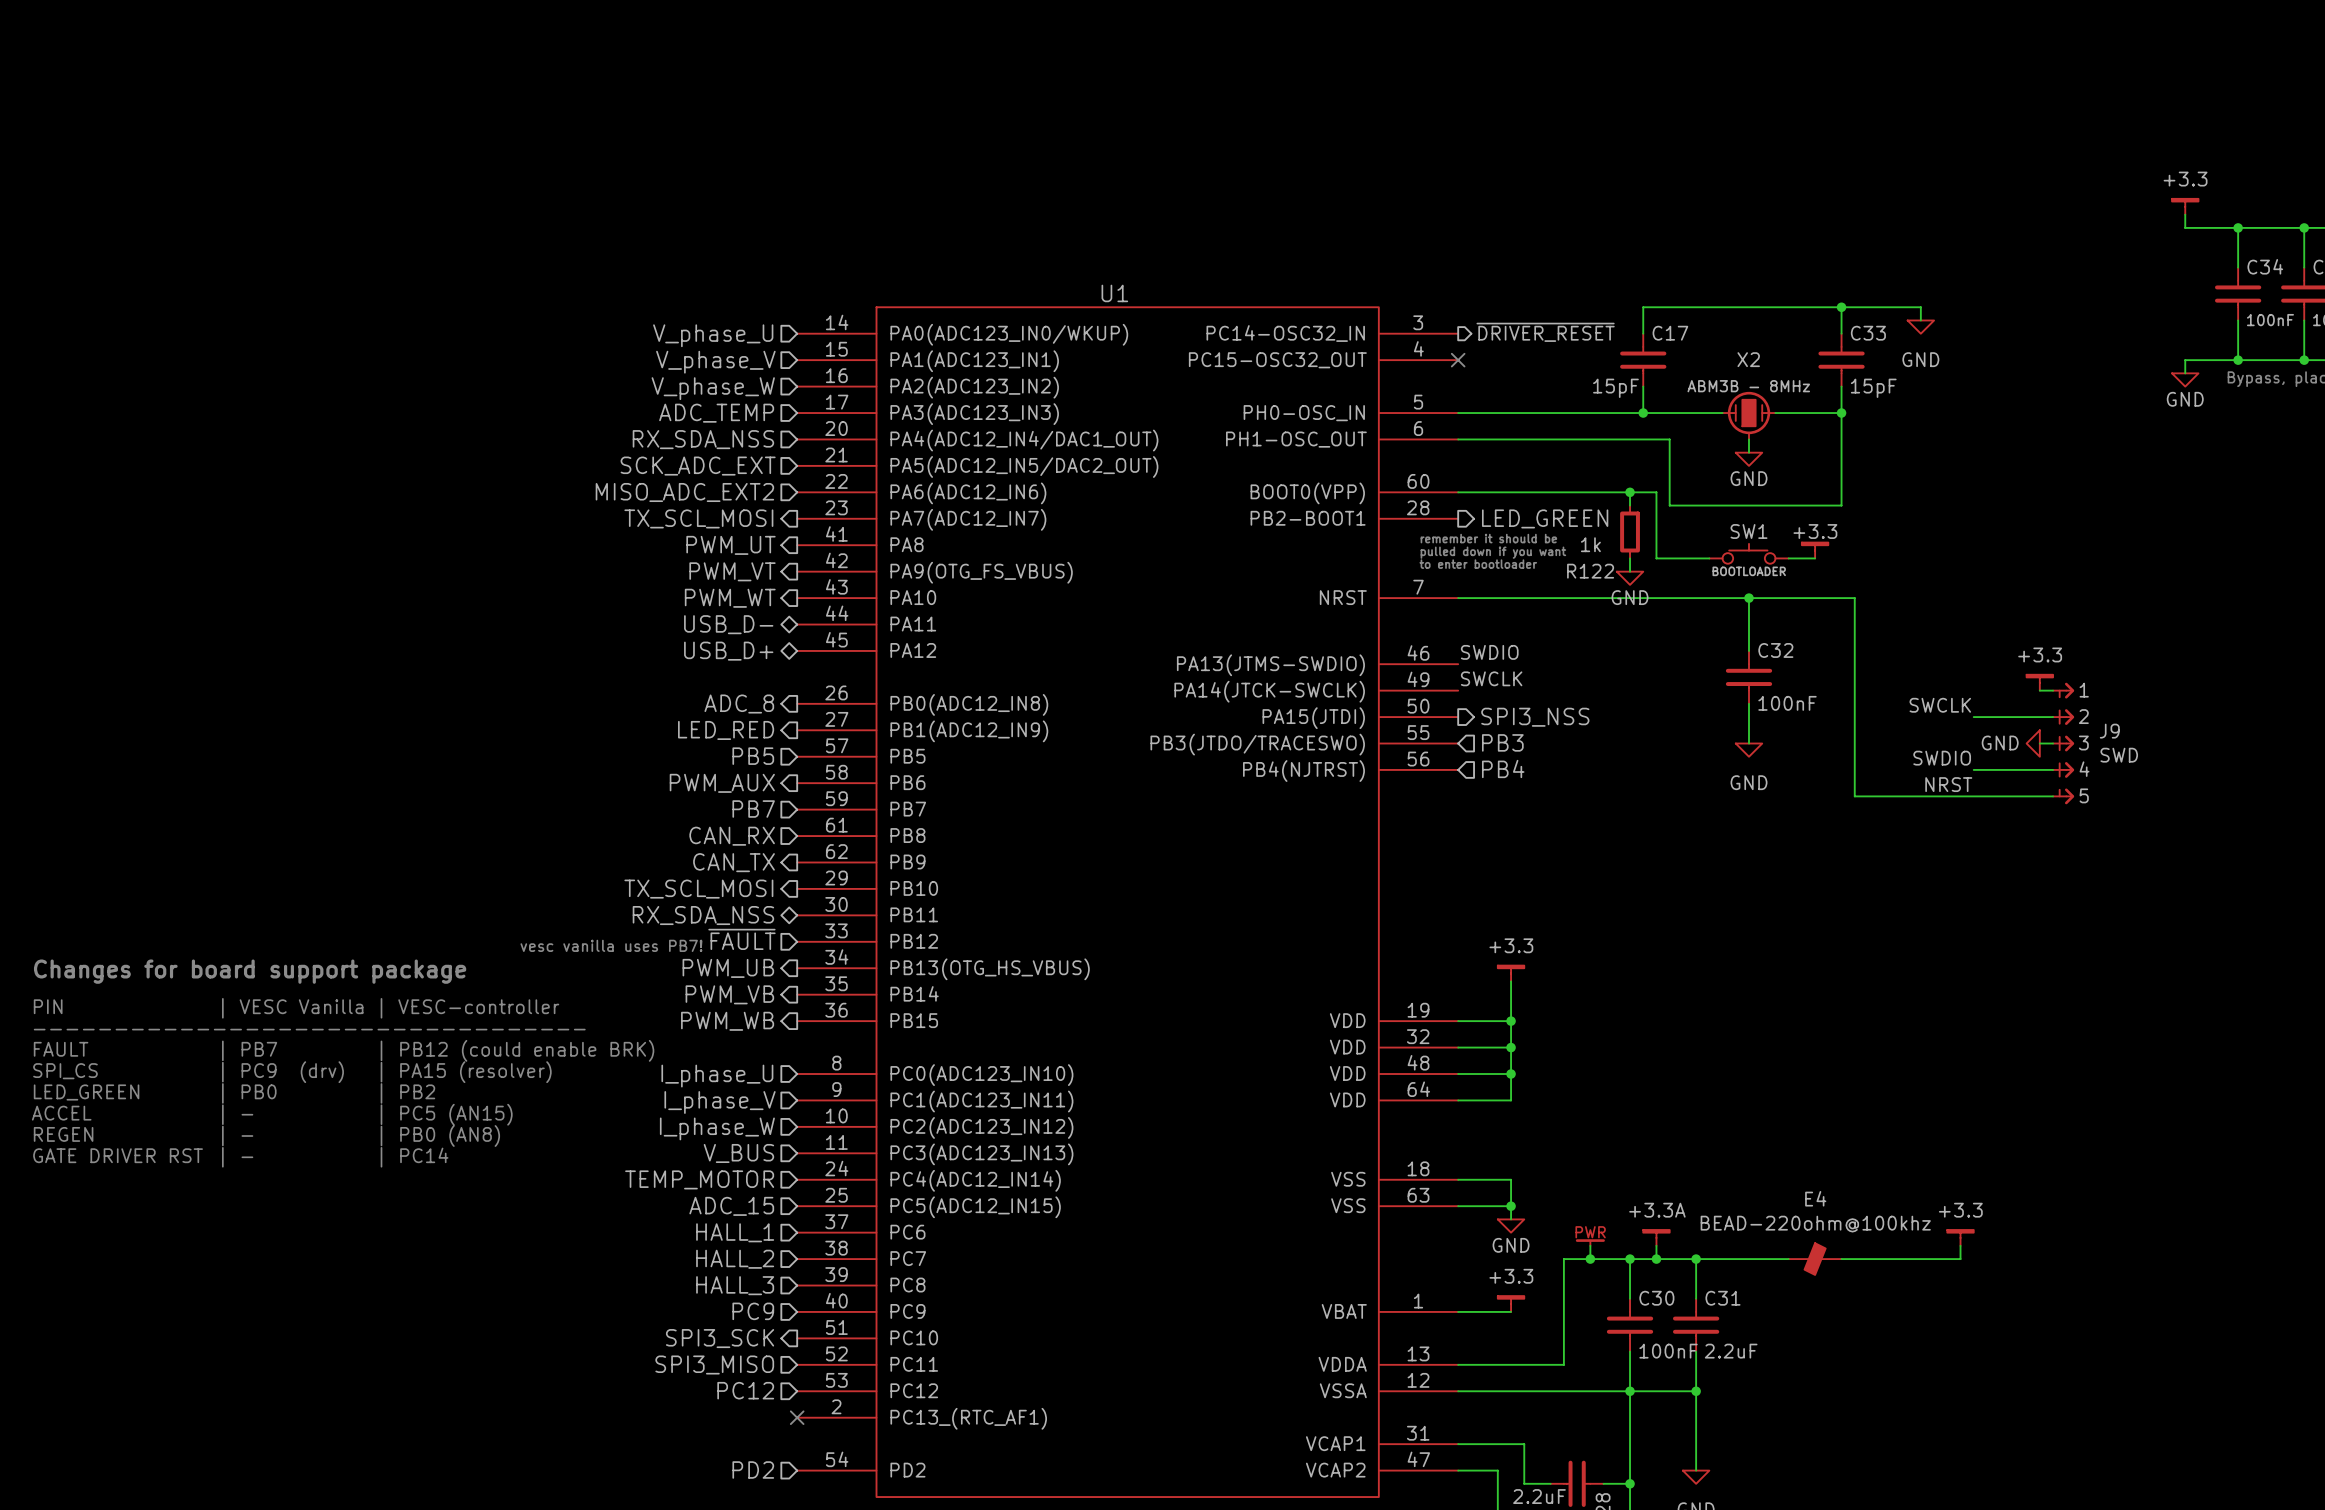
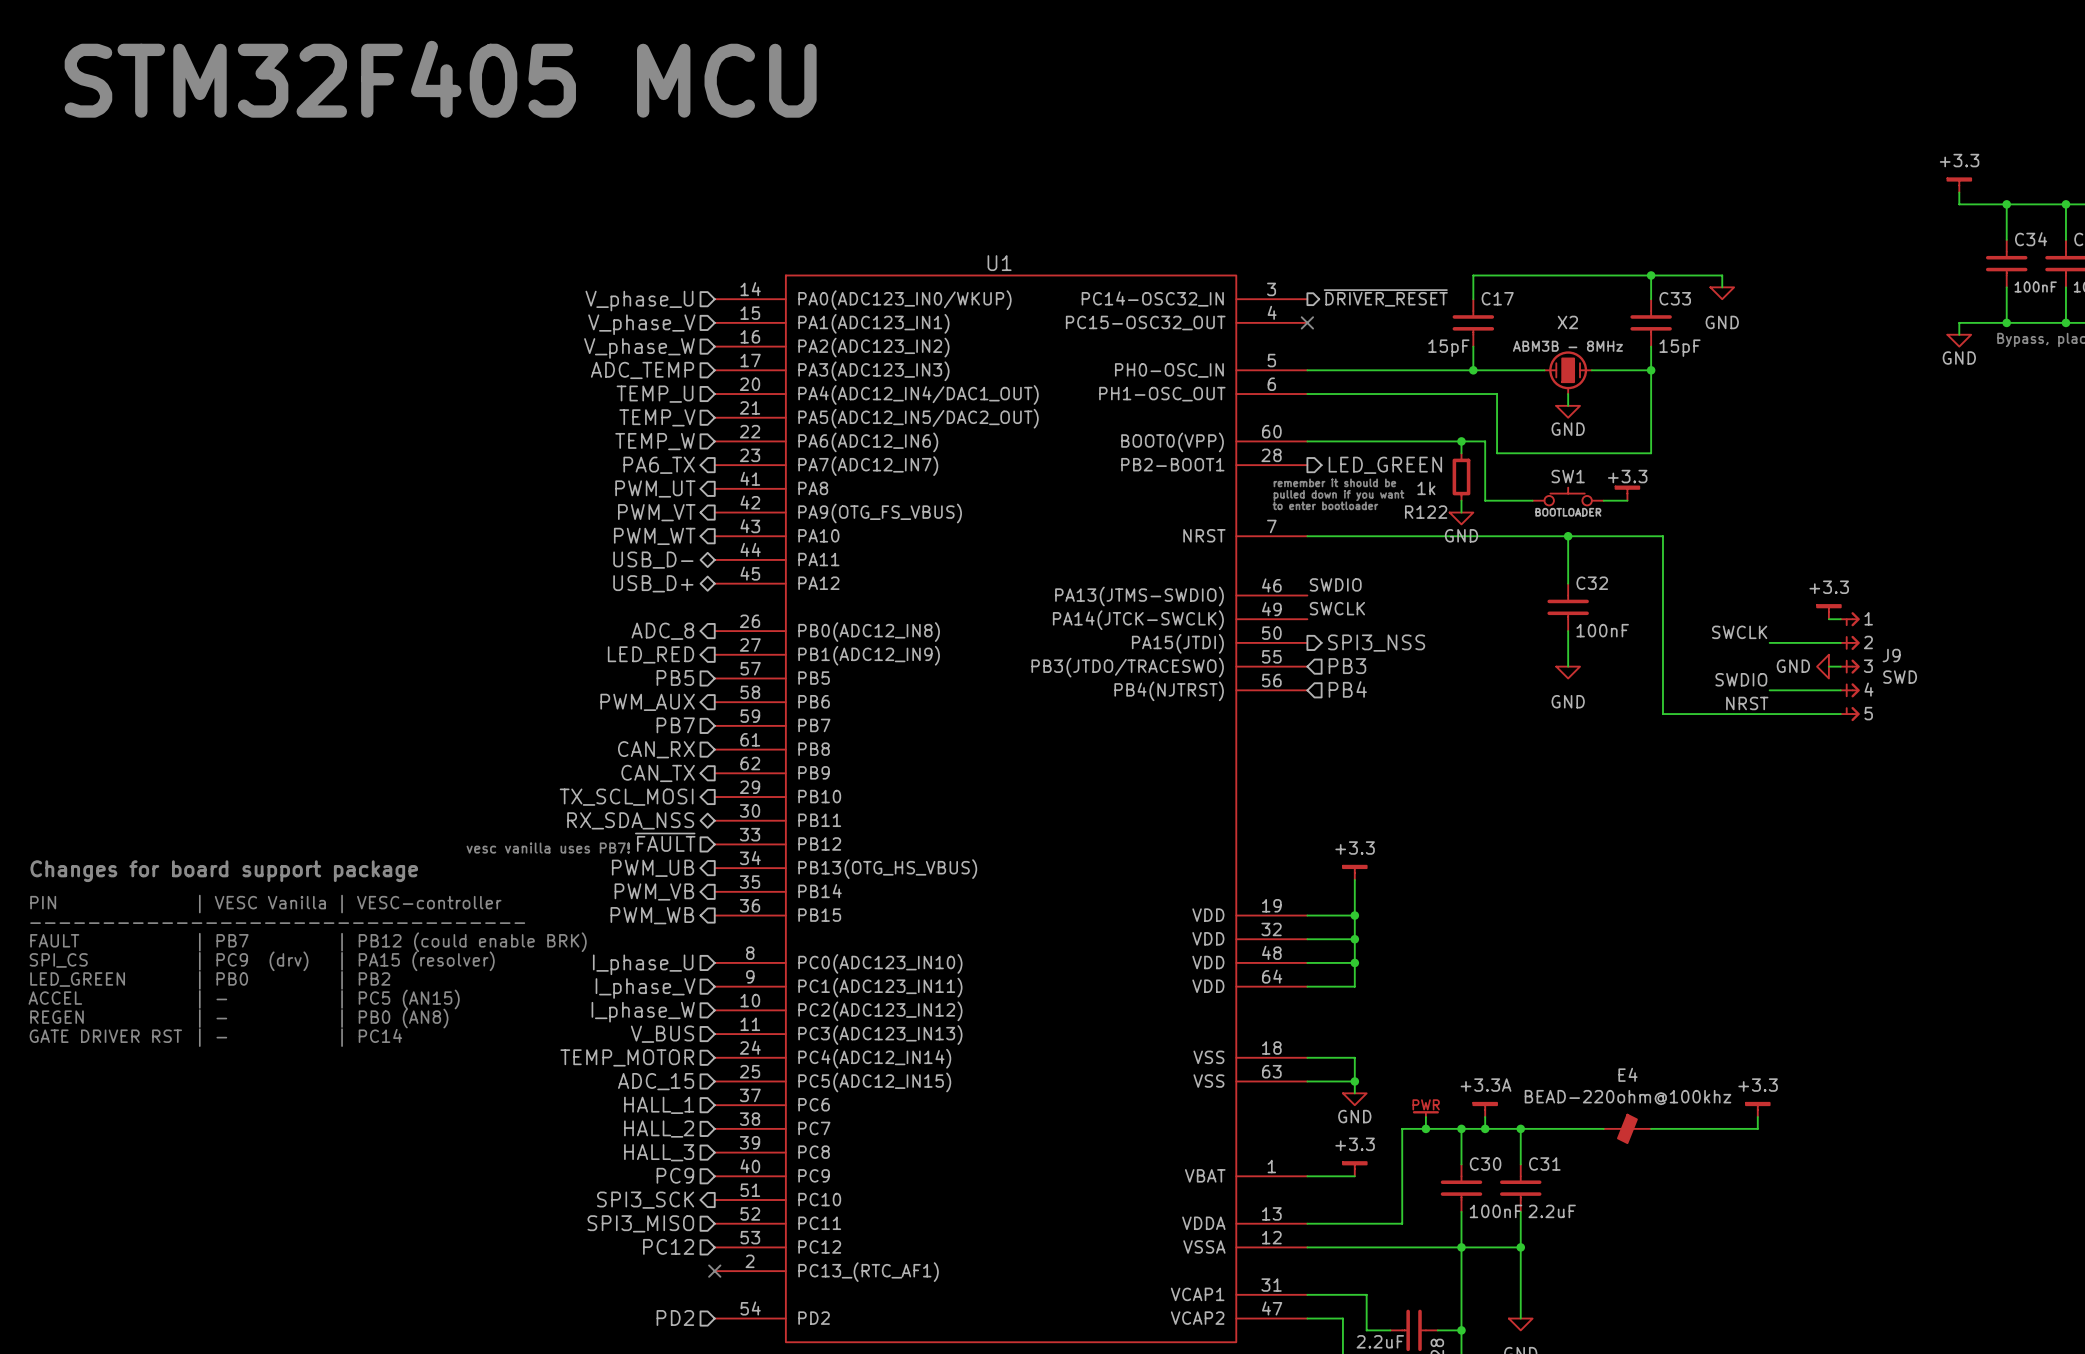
text: none -> STM32F405 MCU (440, 79)
hierarchical label: RX_SDA_NSS (703, 439) -> TEMP_U (655, 394)
hierarchical label: SCK_ADC_EXT (698, 466) -> TEMP_V (657, 417)
hierarchical label: MISO_ADC_EXT2 (684, 492) -> TEMP_W (655, 441)
hierarchical label: TX_SCL_MOSI (698, 518) -> PA6_TX (659, 465)

